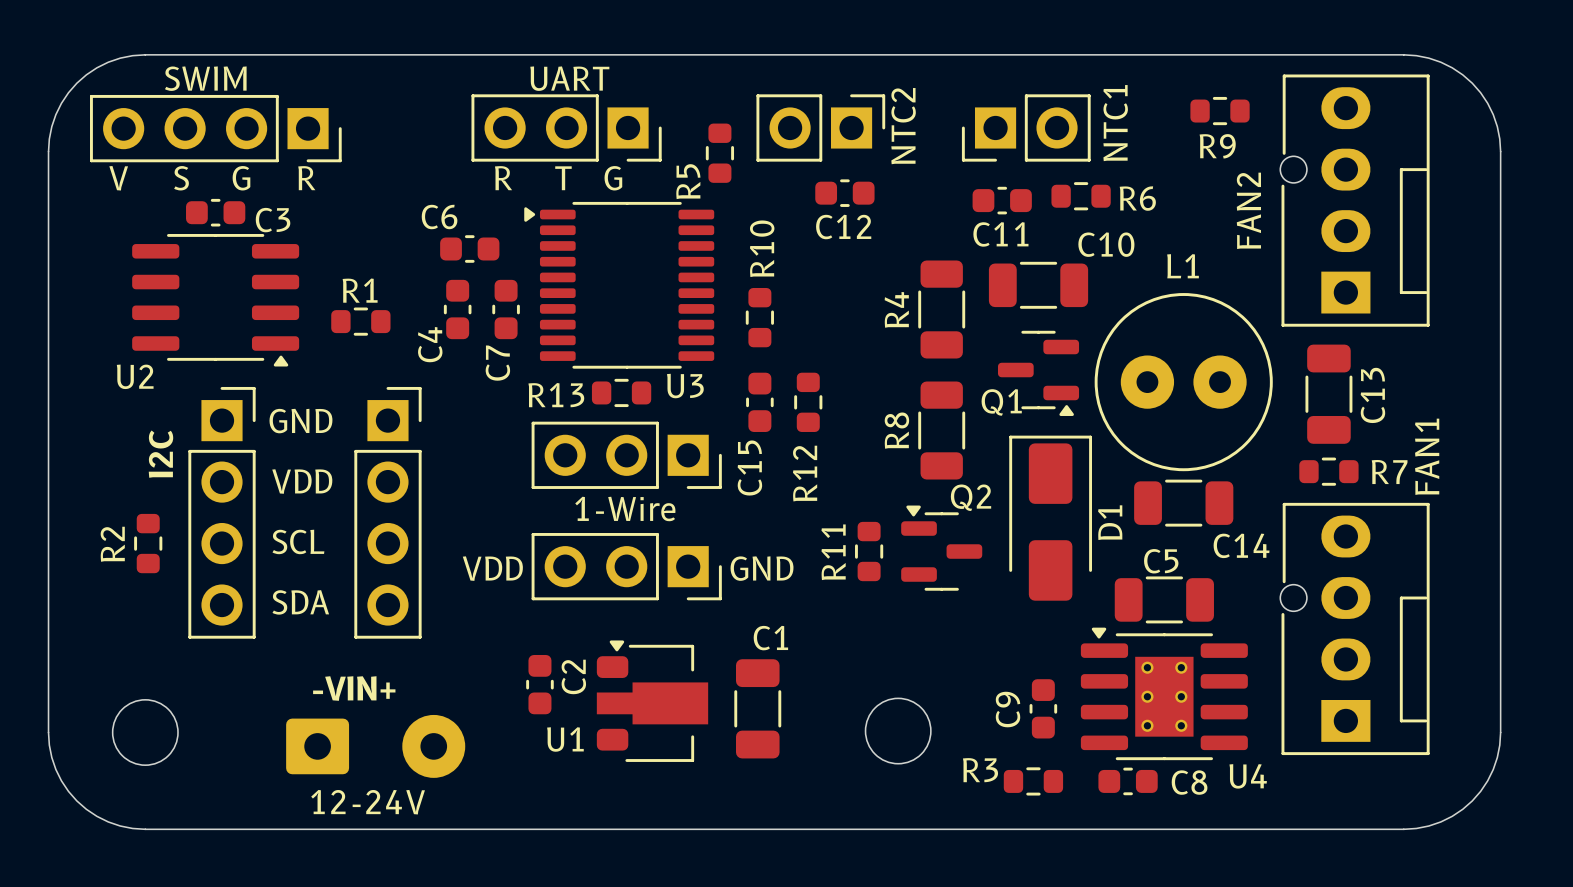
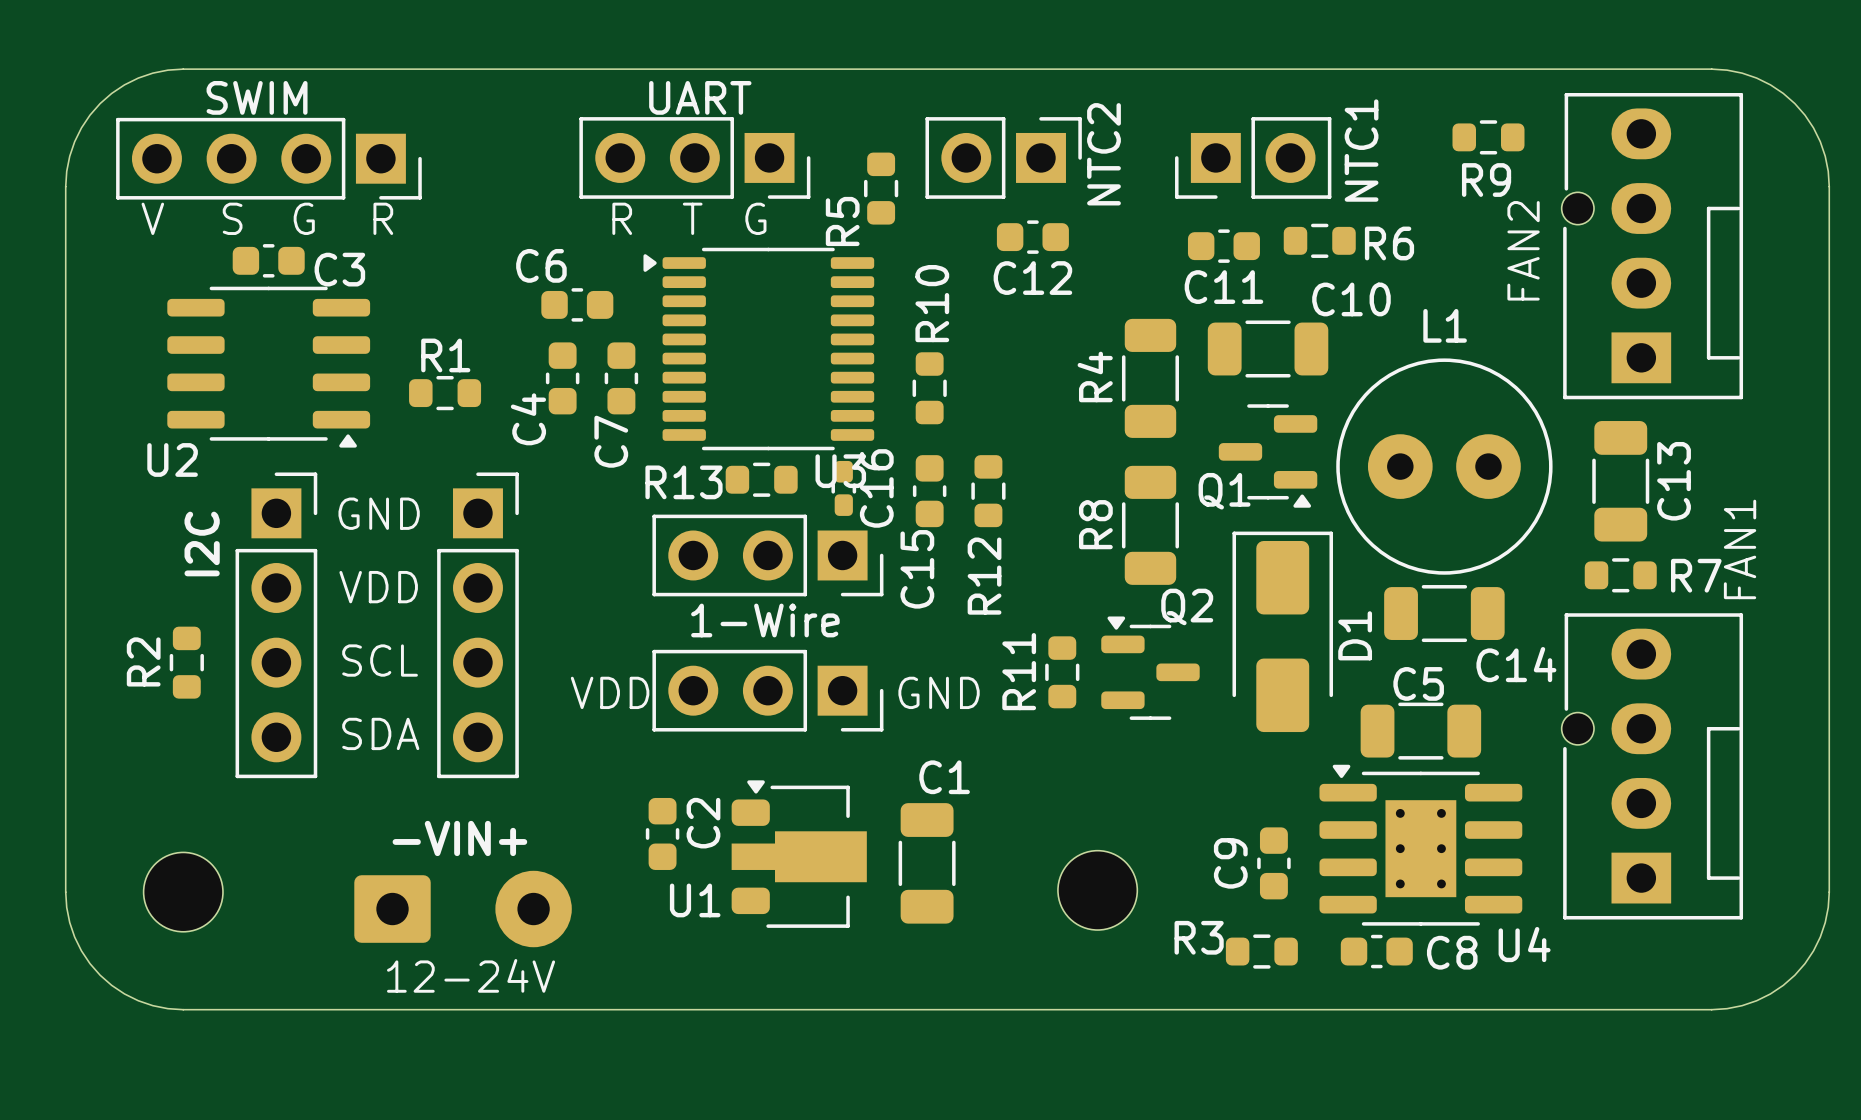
C16: none -> (843, 488)

